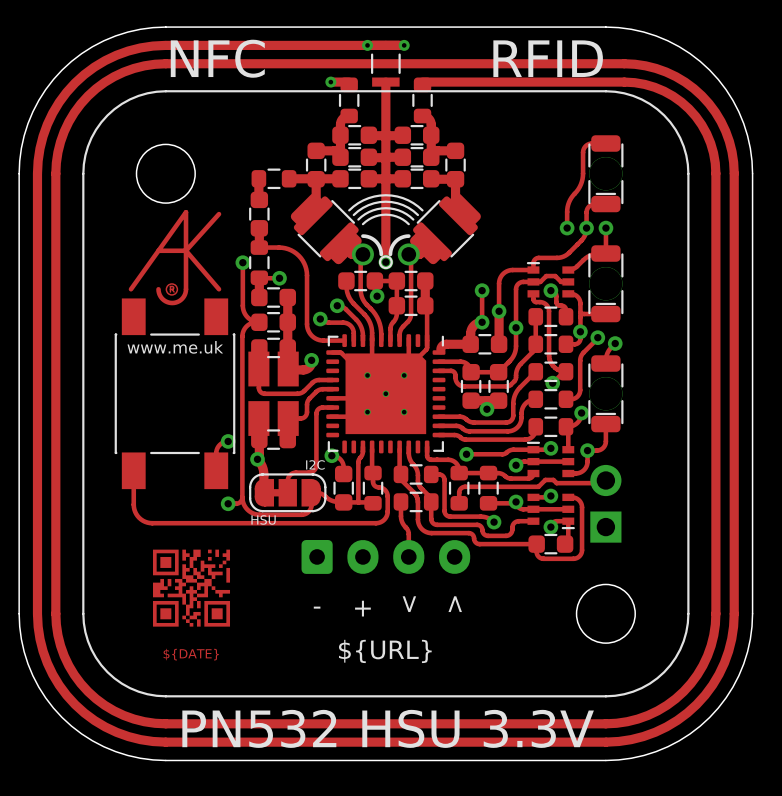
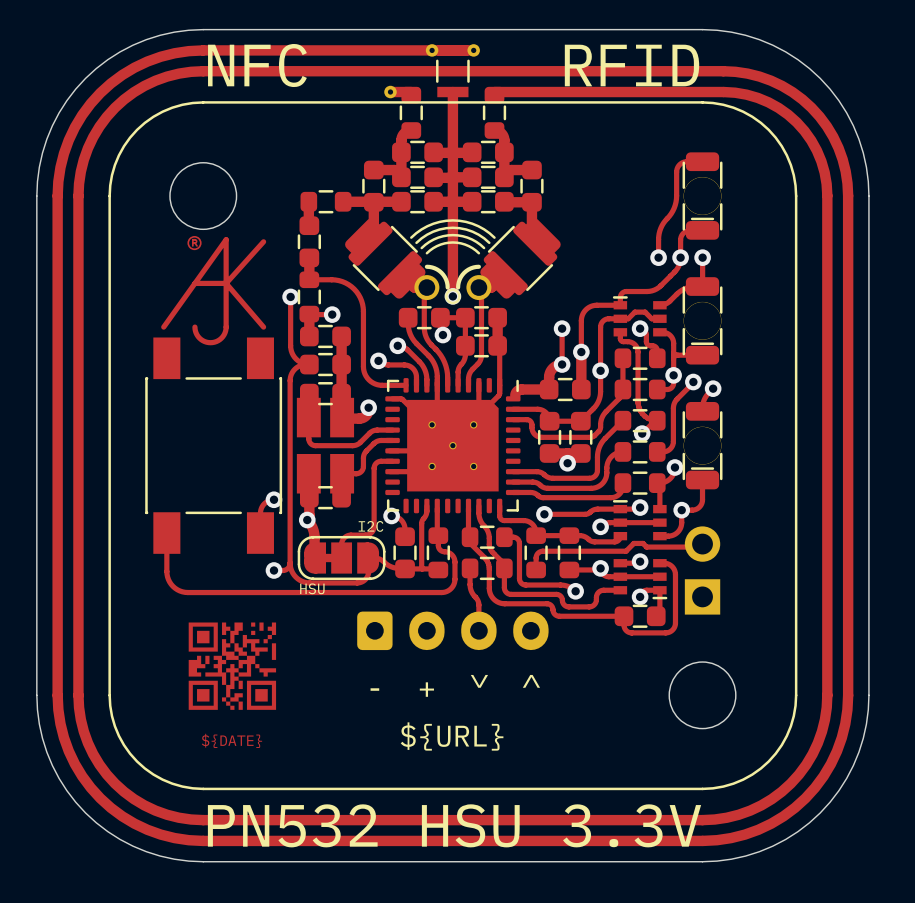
drawing shape: [127, 209, 224, 354] -> [161, 235, 267, 346]

